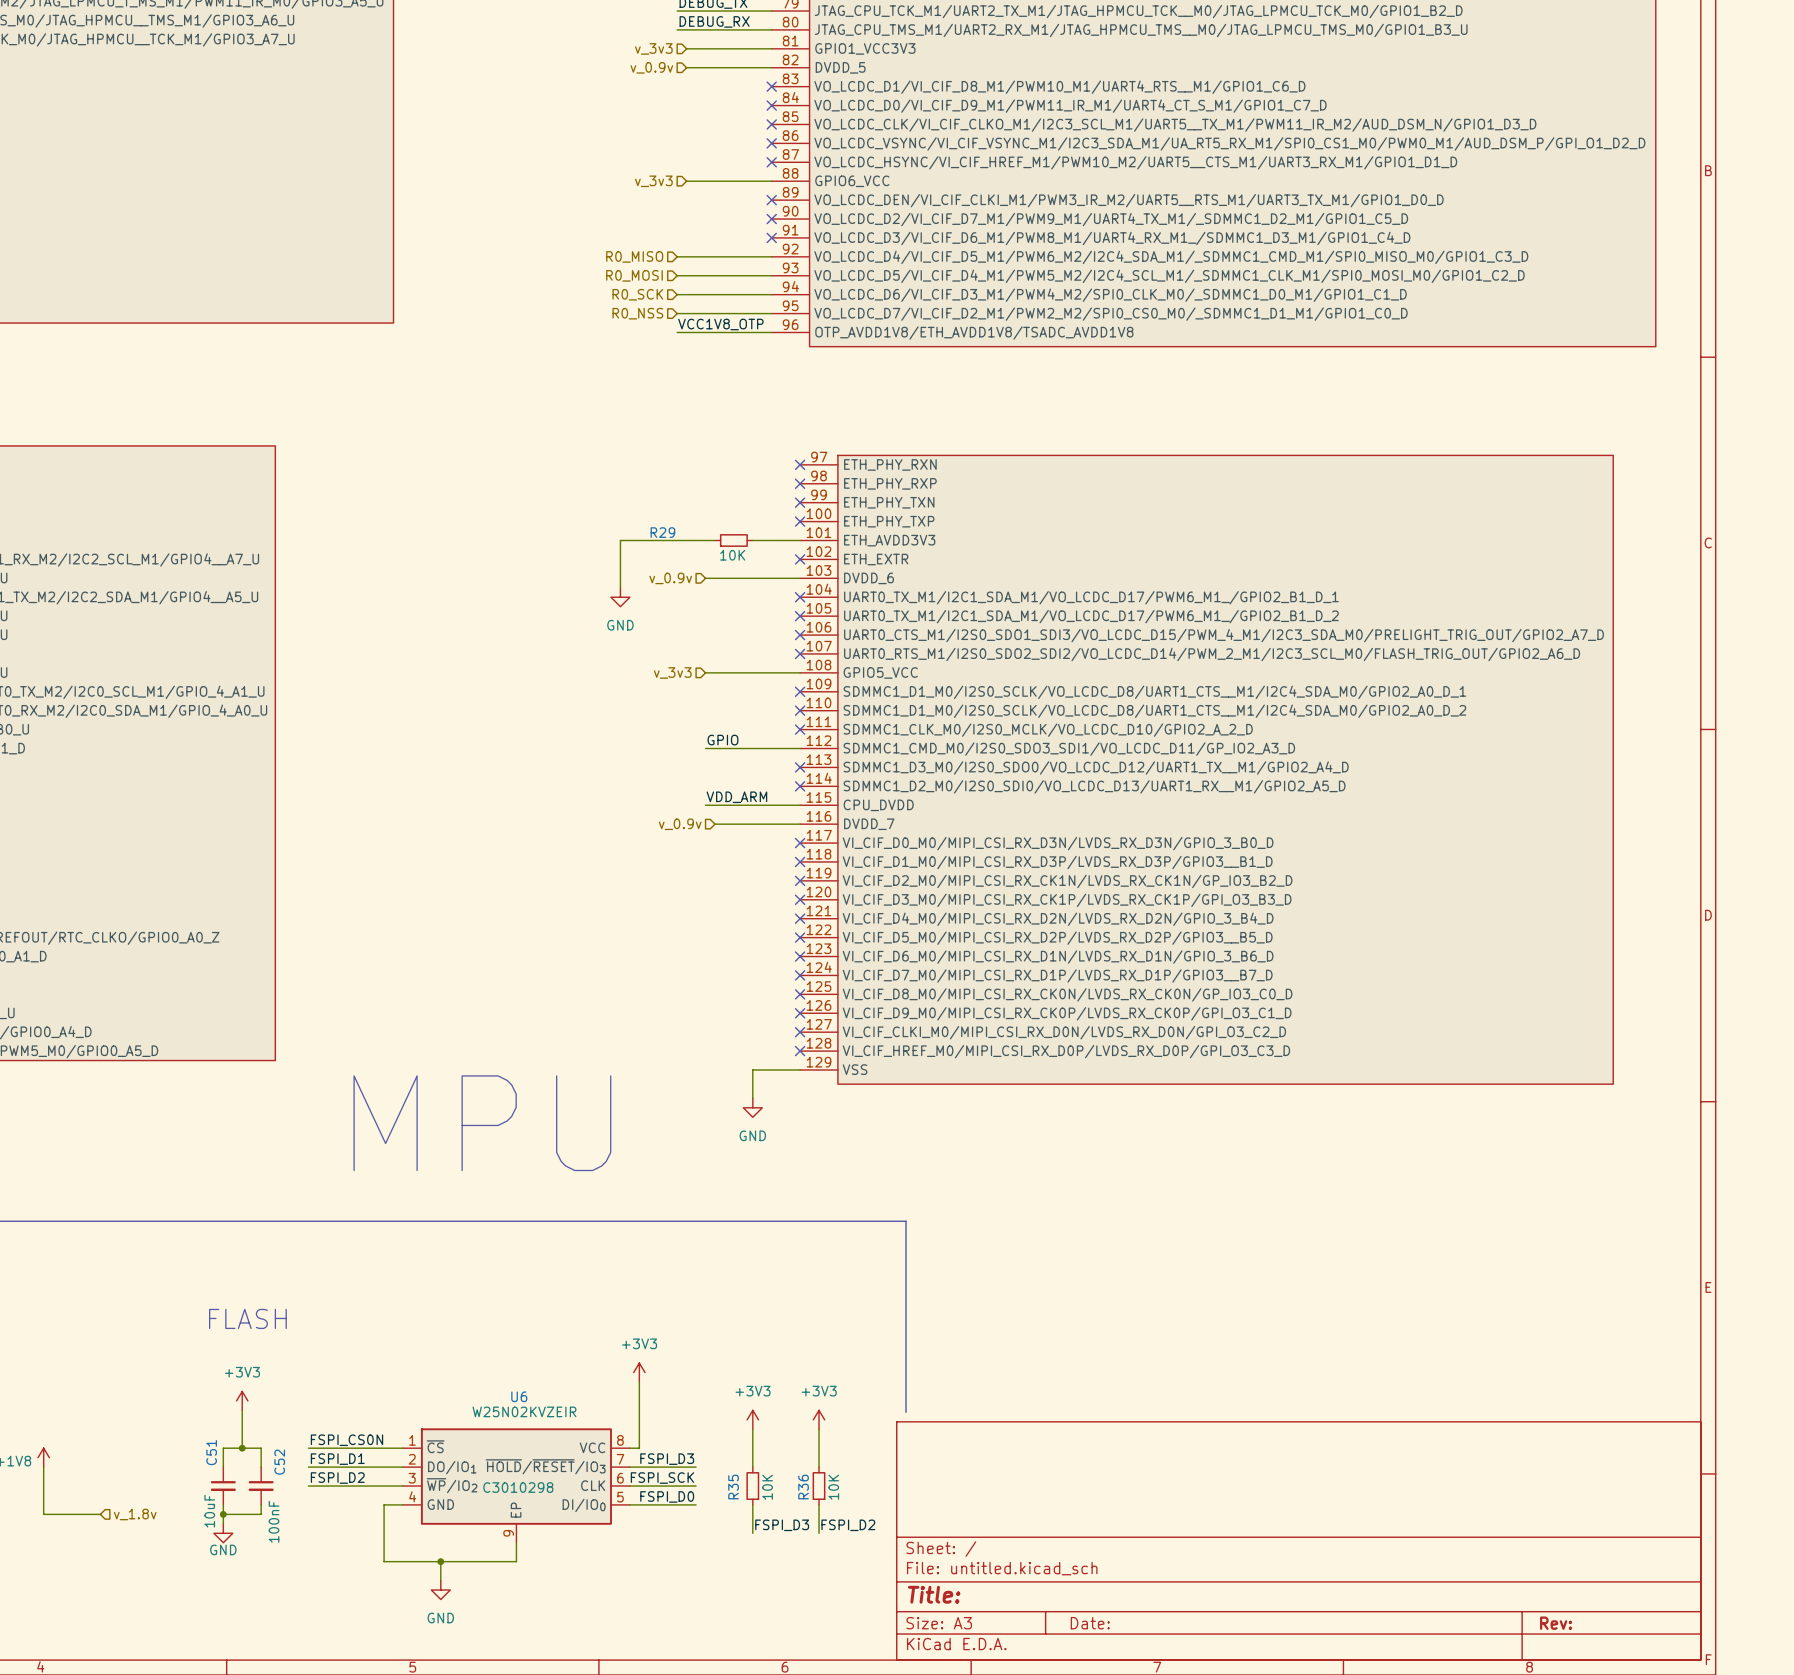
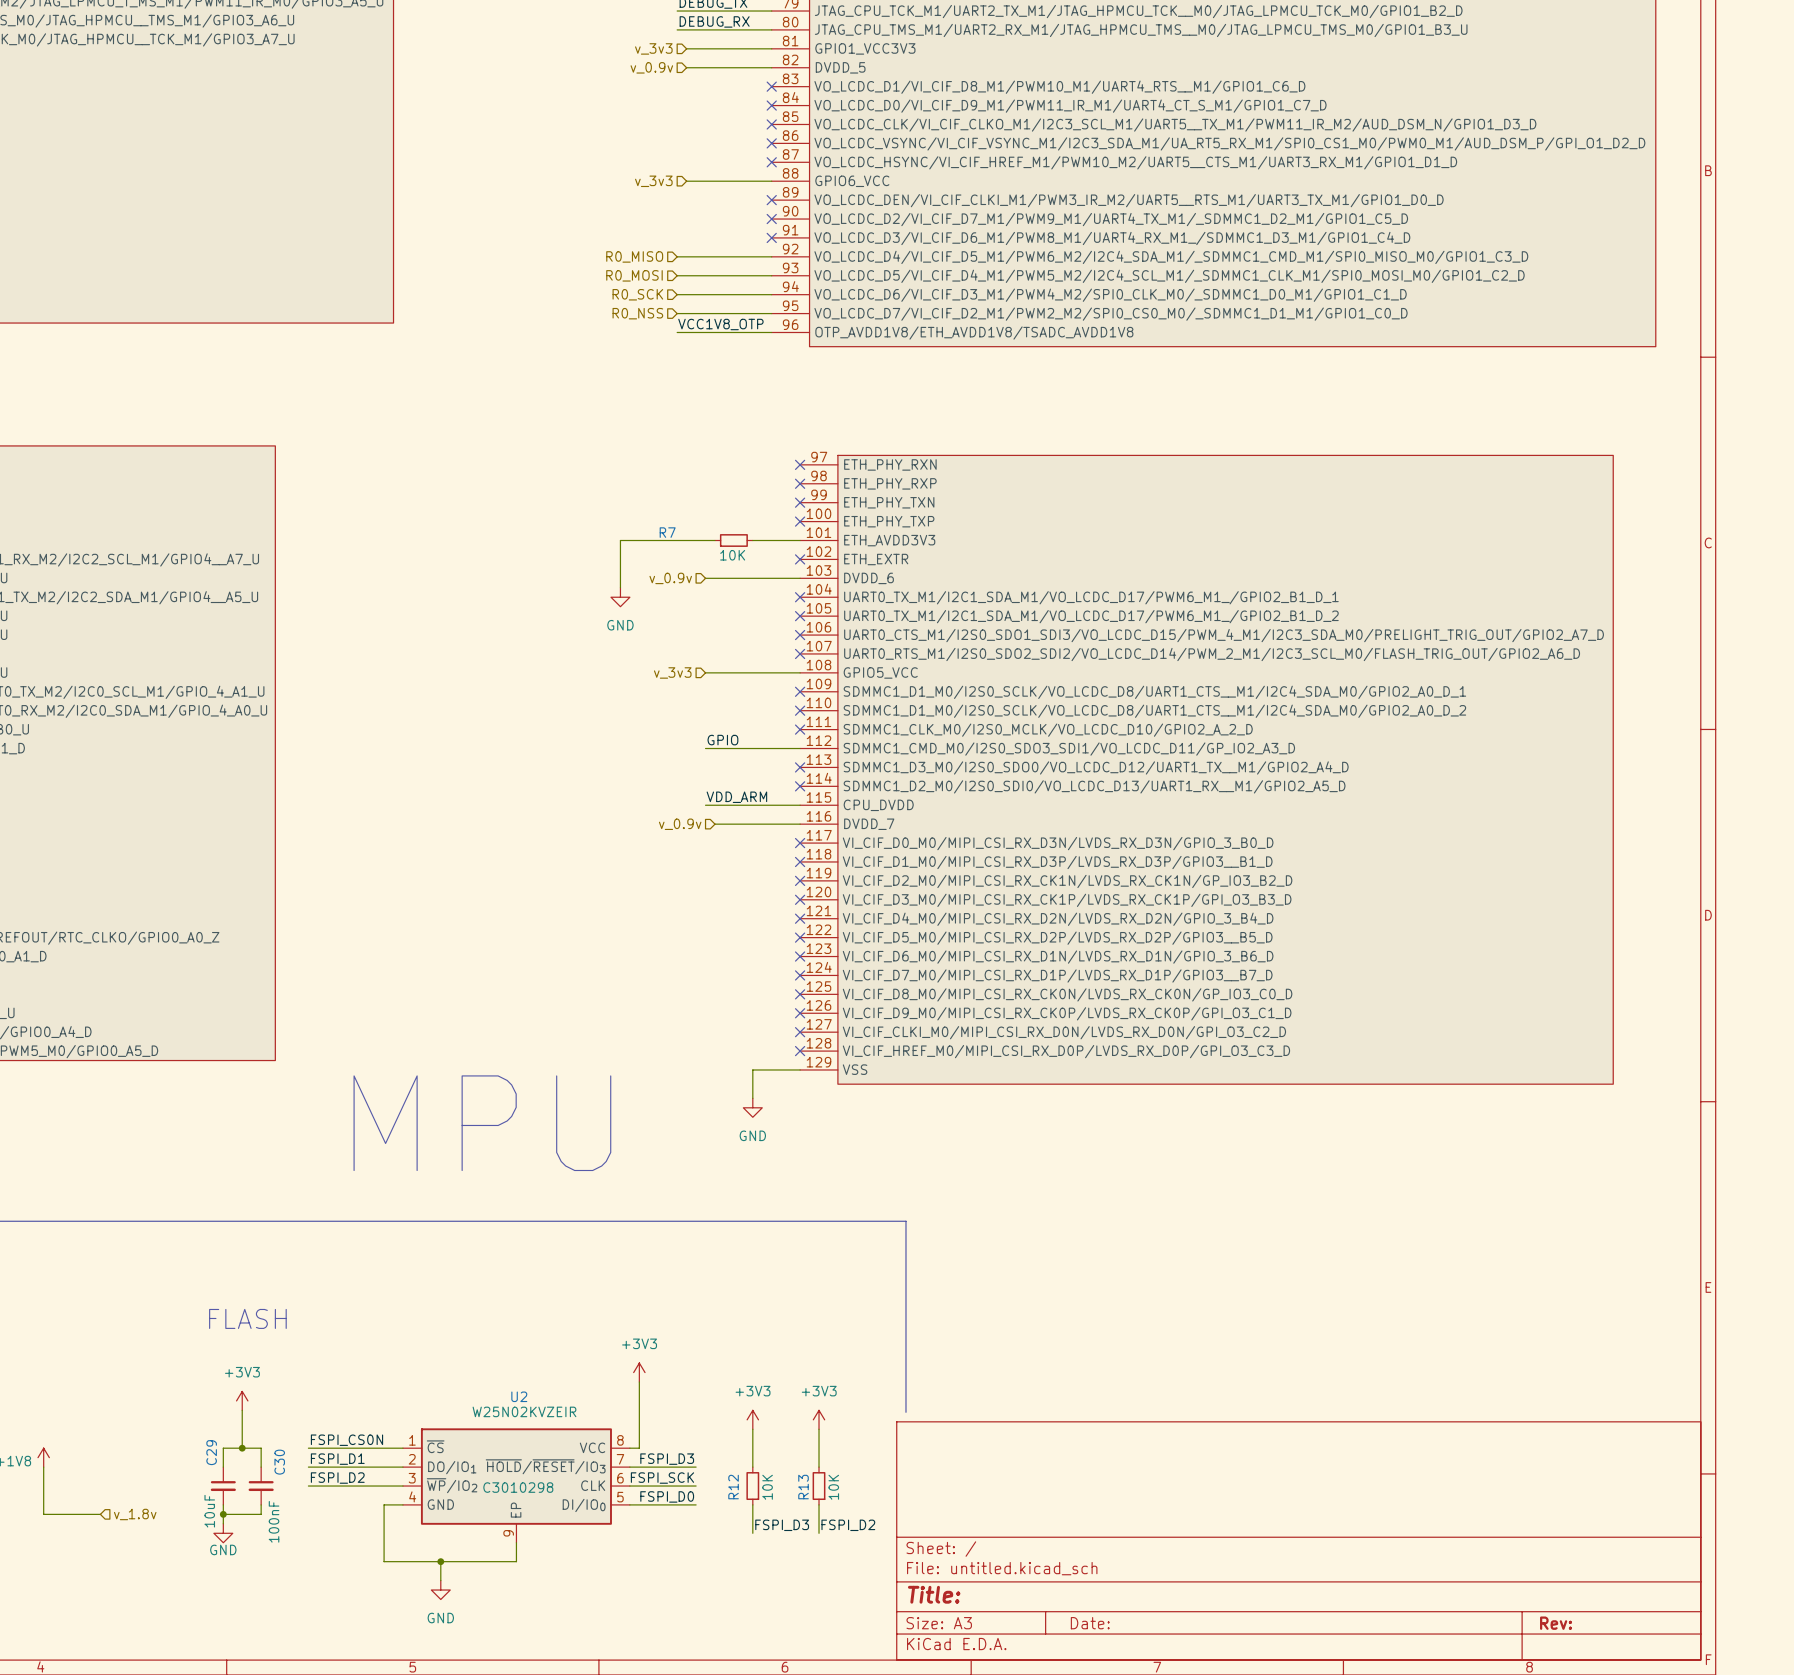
R29 name: R29 (662, 532) -> R7 (667, 532)
U6 name: U6 (519, 1396) -> U2 (519, 1396)
C51 name: C51 (211, 1452) -> C29 (211, 1452)
C52 name: C52 (279, 1462) -> C30 (279, 1462)
R35 name: R35 (733, 1487) -> R12 (733, 1487)
R36 name: R36 (803, 1487) -> R13 (803, 1487)

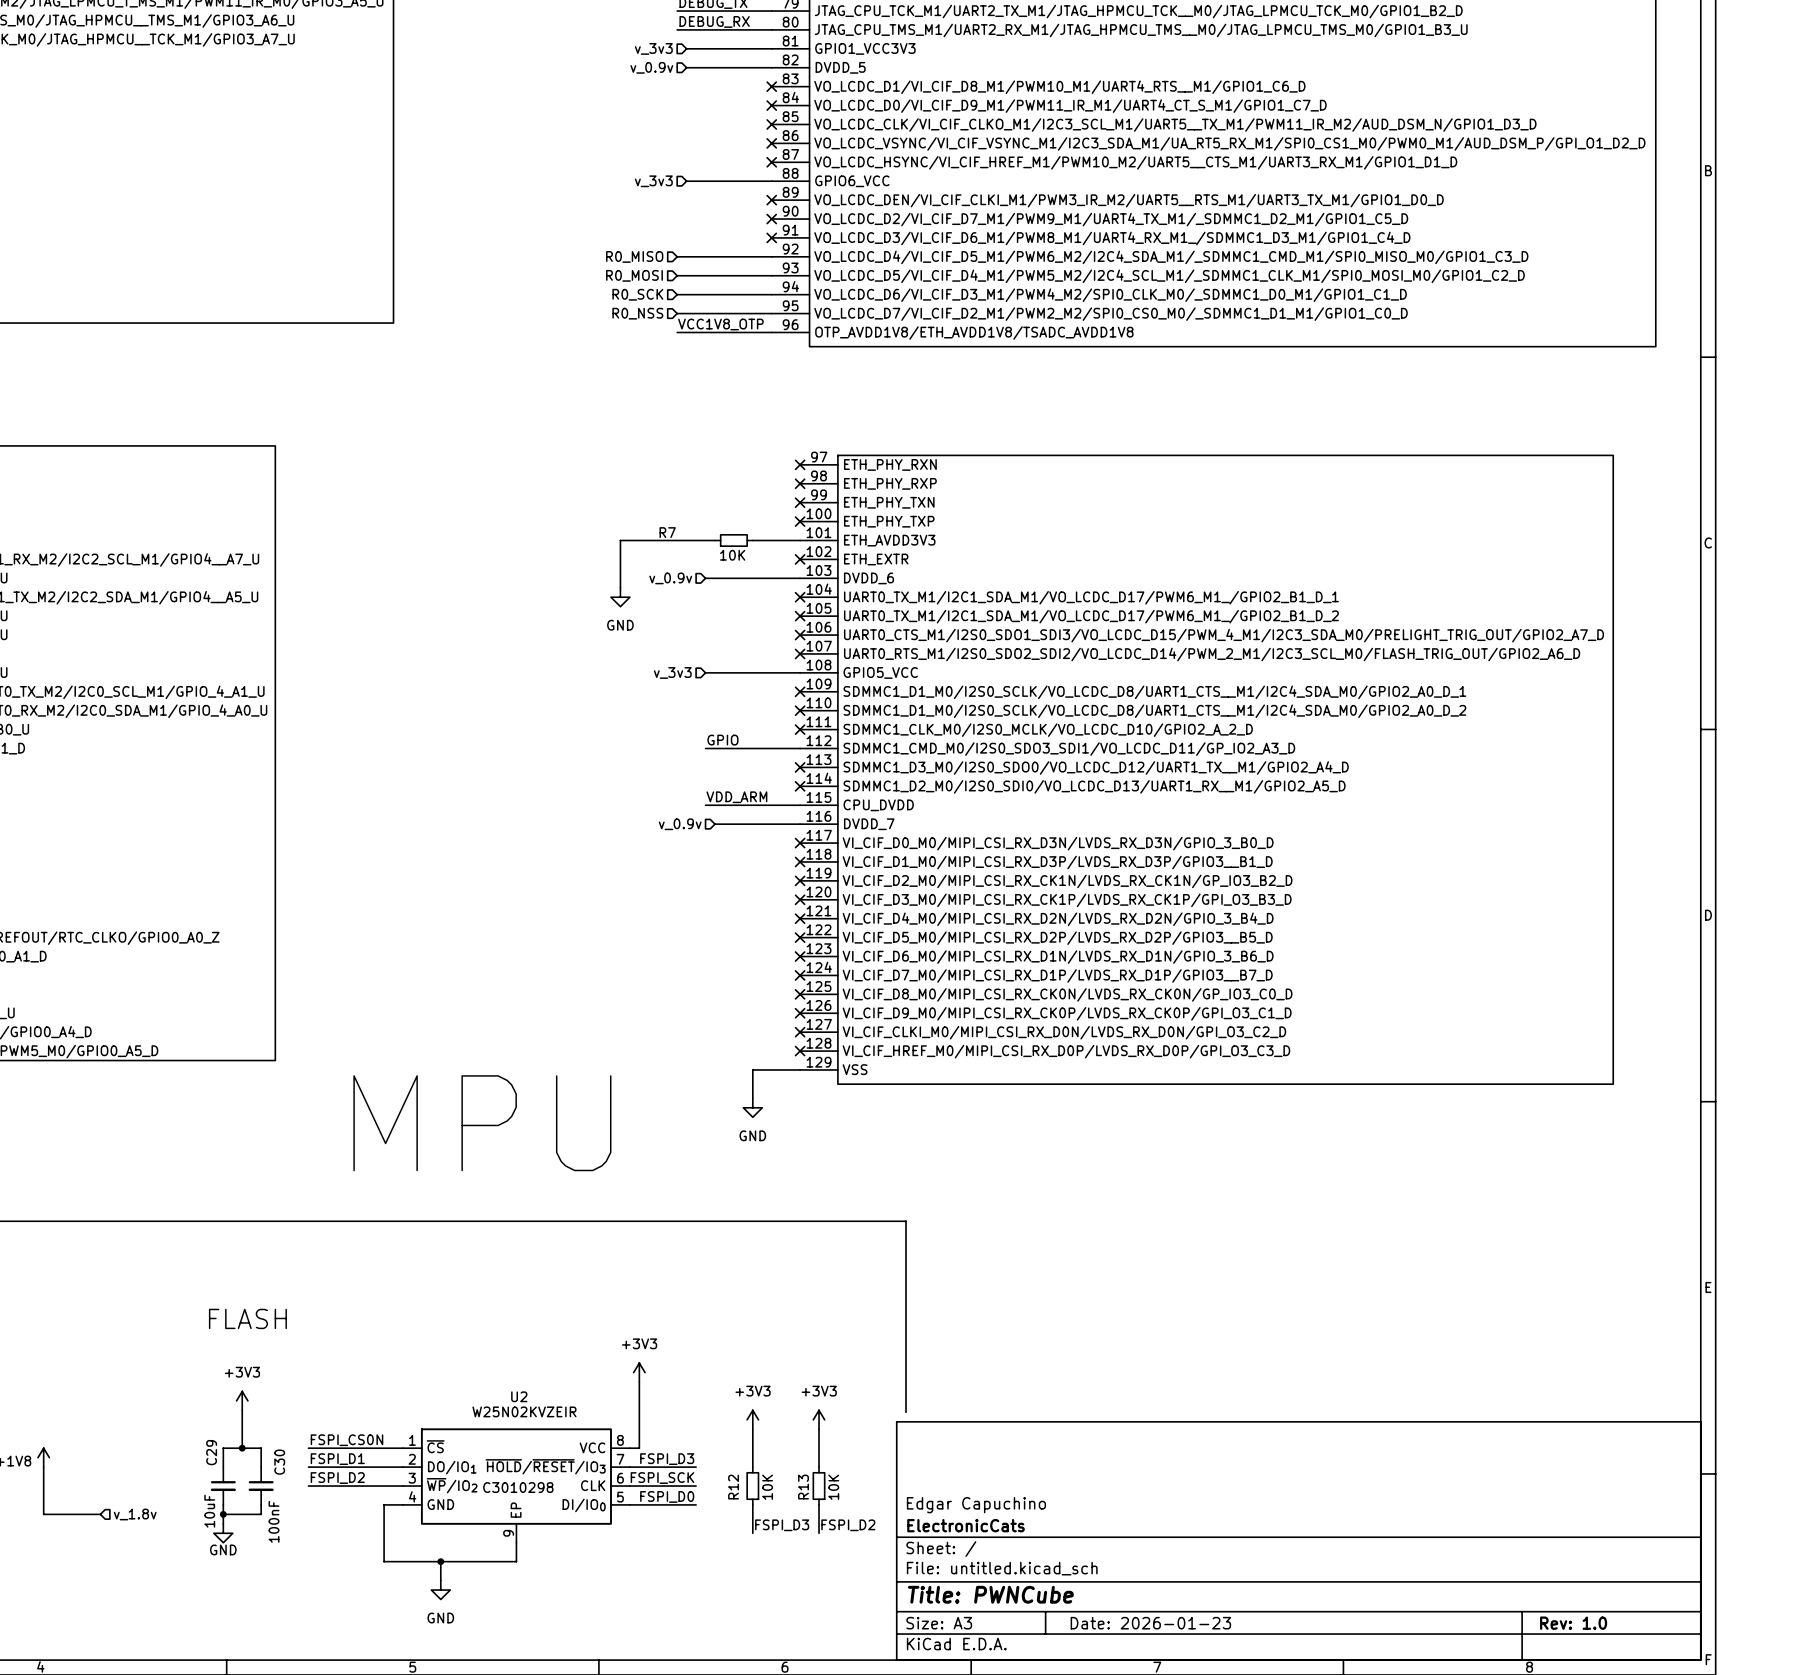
title block: none -> Edgar Capuchino (976, 1505)
title block: none -> ElectronicCats (966, 1525)
title block: Title: (934, 1594) -> Title: PWNCube (990, 1594)
title block: Date: (1090, 1623) -> Date: 2026-01-23 (1150, 1623)
title block: Rev: (1556, 1623) -> Rev: 1.0 (1573, 1623)

